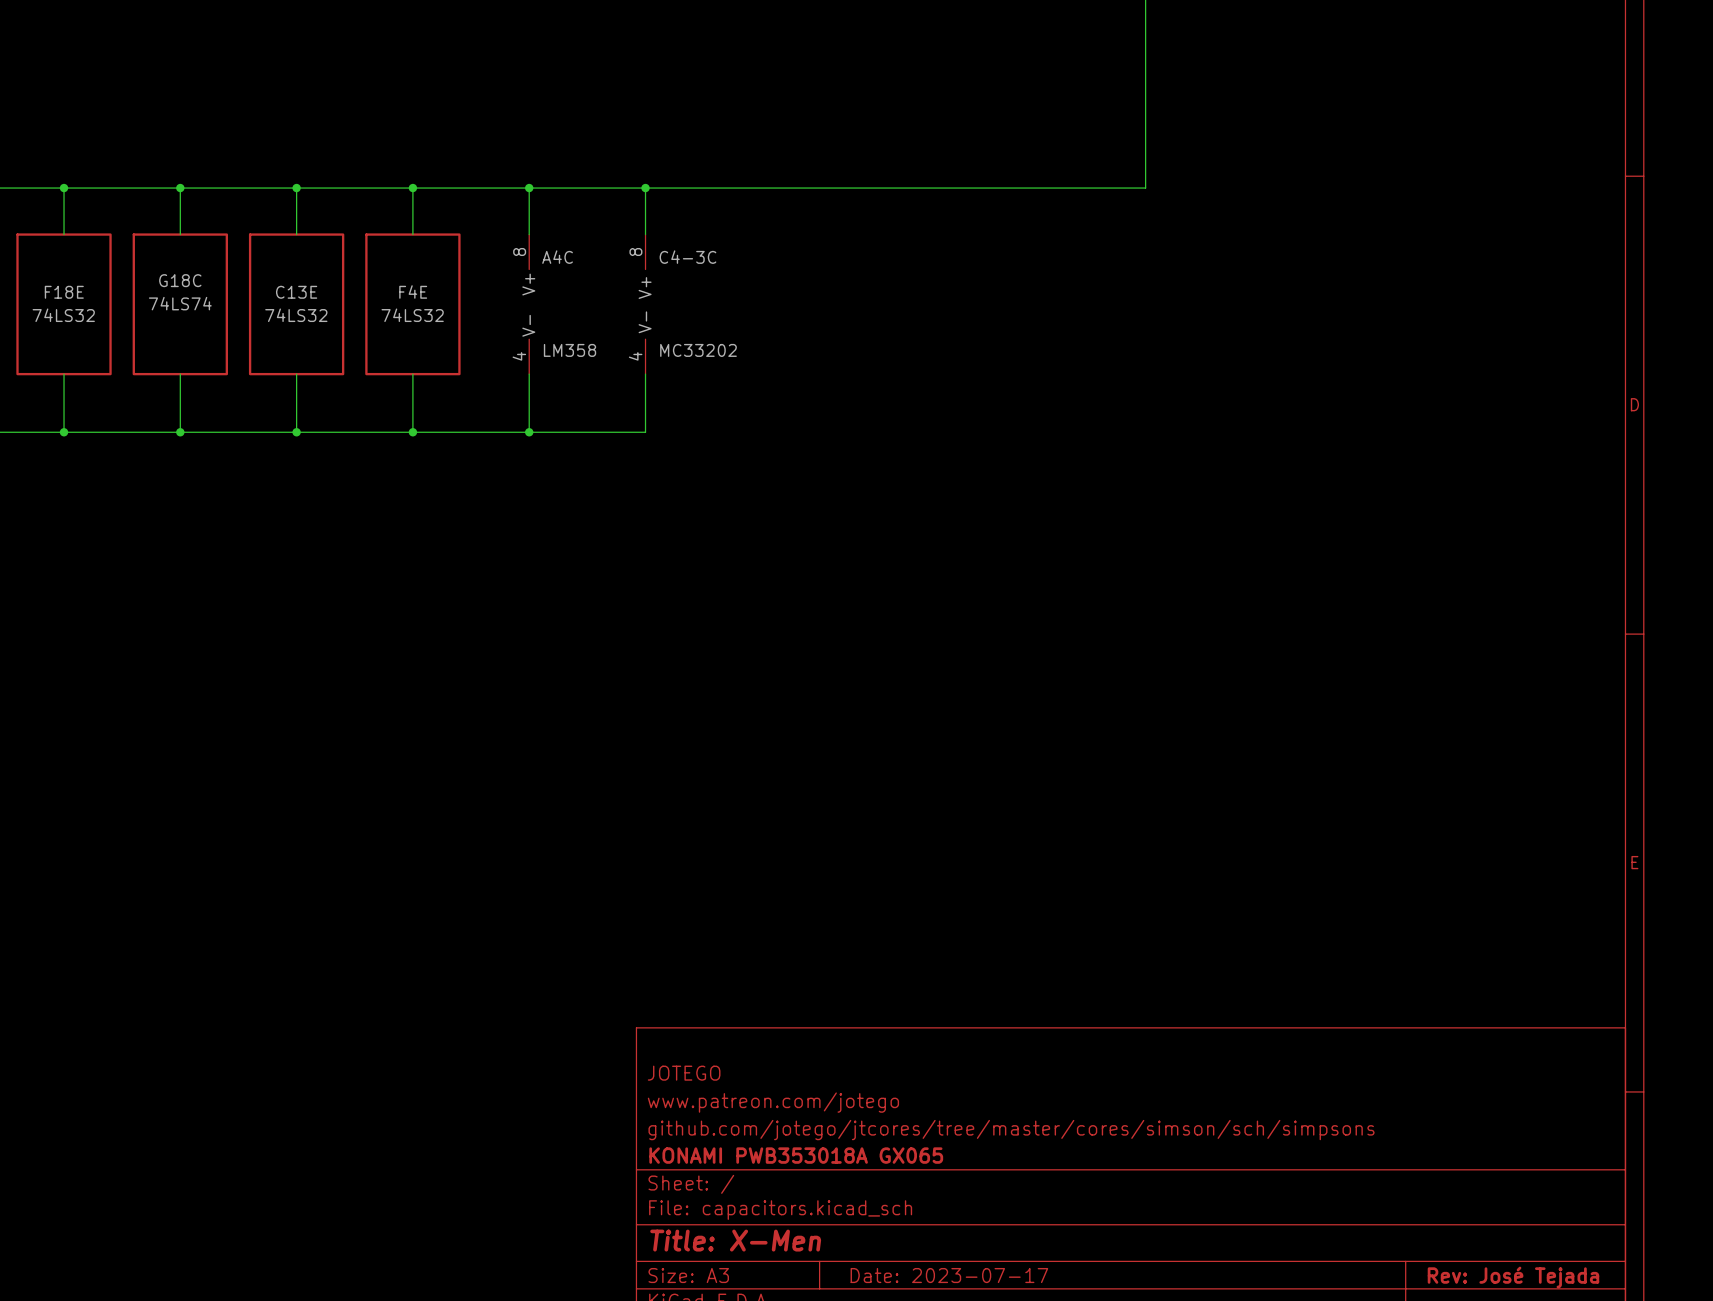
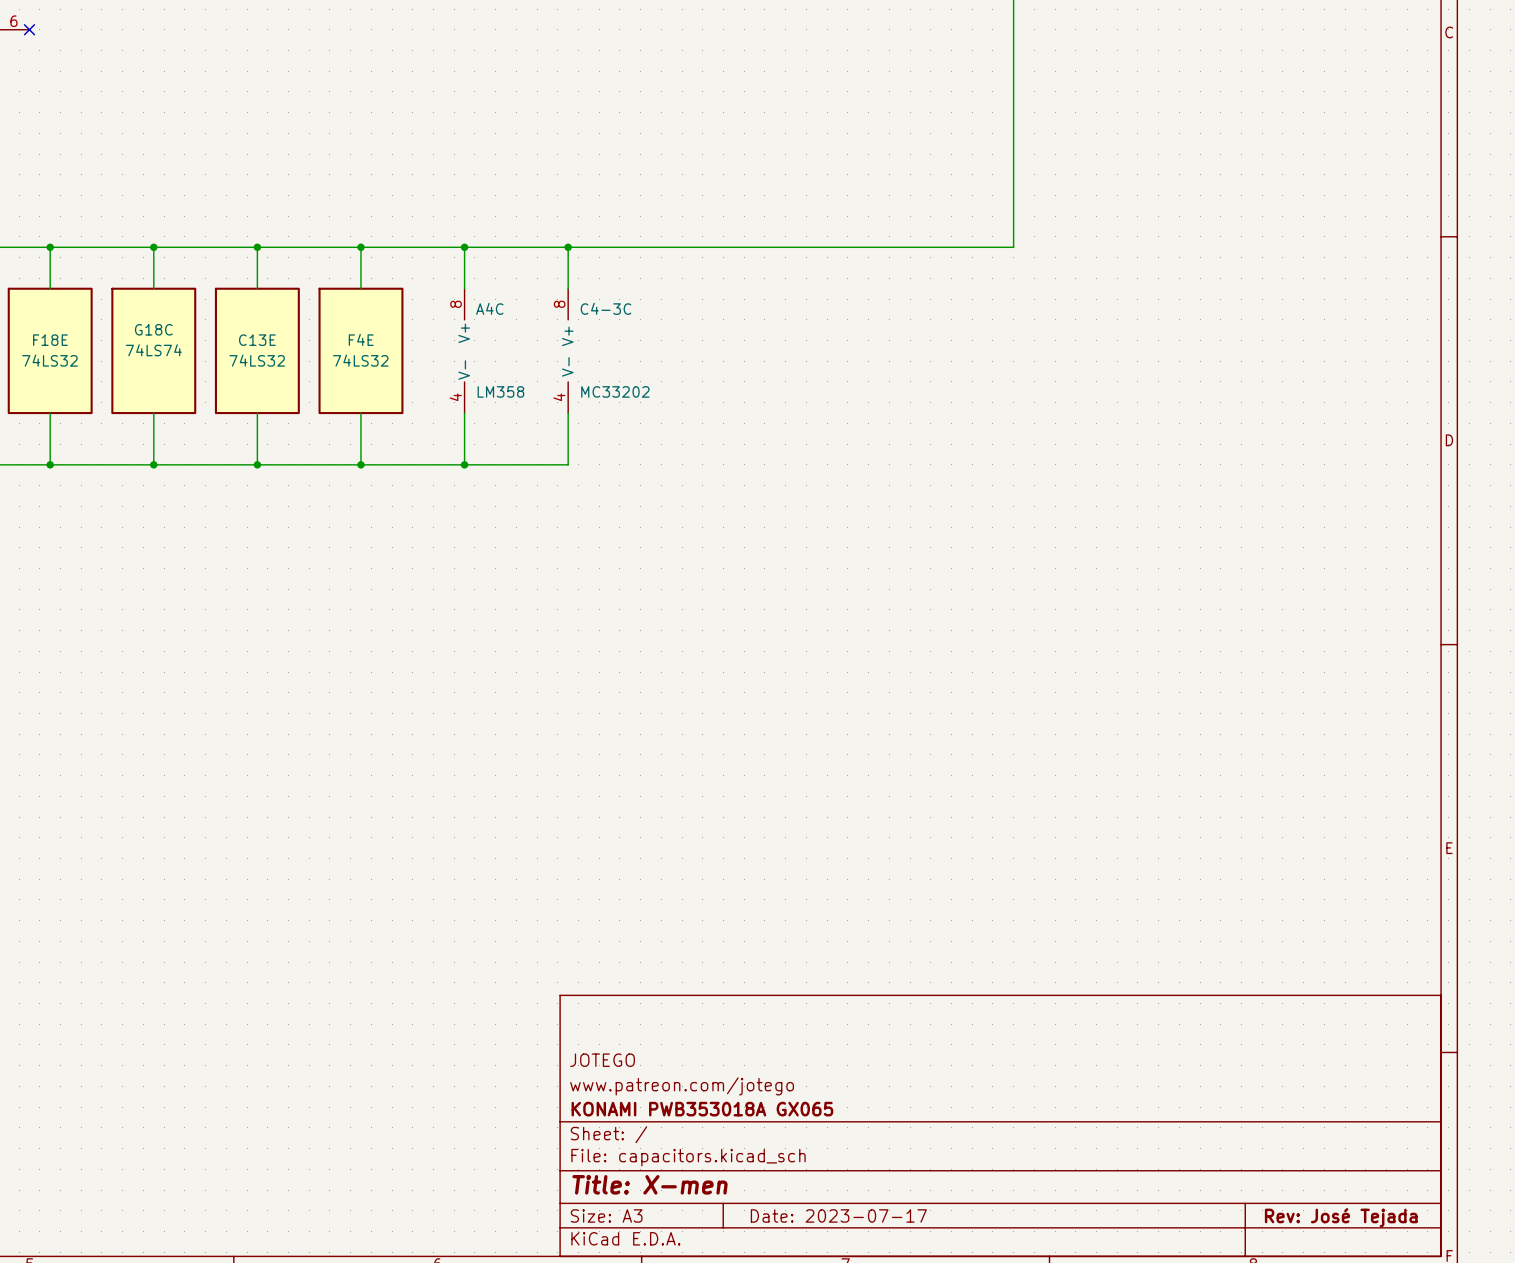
title block: JOTEGO (684, 1073) -> none
title block: www.patreon.com/jotego (773, 1102) -> JOTEGO (602, 1060)
title block: github.com/jotego/jtcores/tree/master/cores/simson/sch/simpsons (1011, 1130) -> www.patreon.com/jotego (682, 1086)
title block: Title: X-Men (735, 1240) -> Title: X-men (650, 1184)

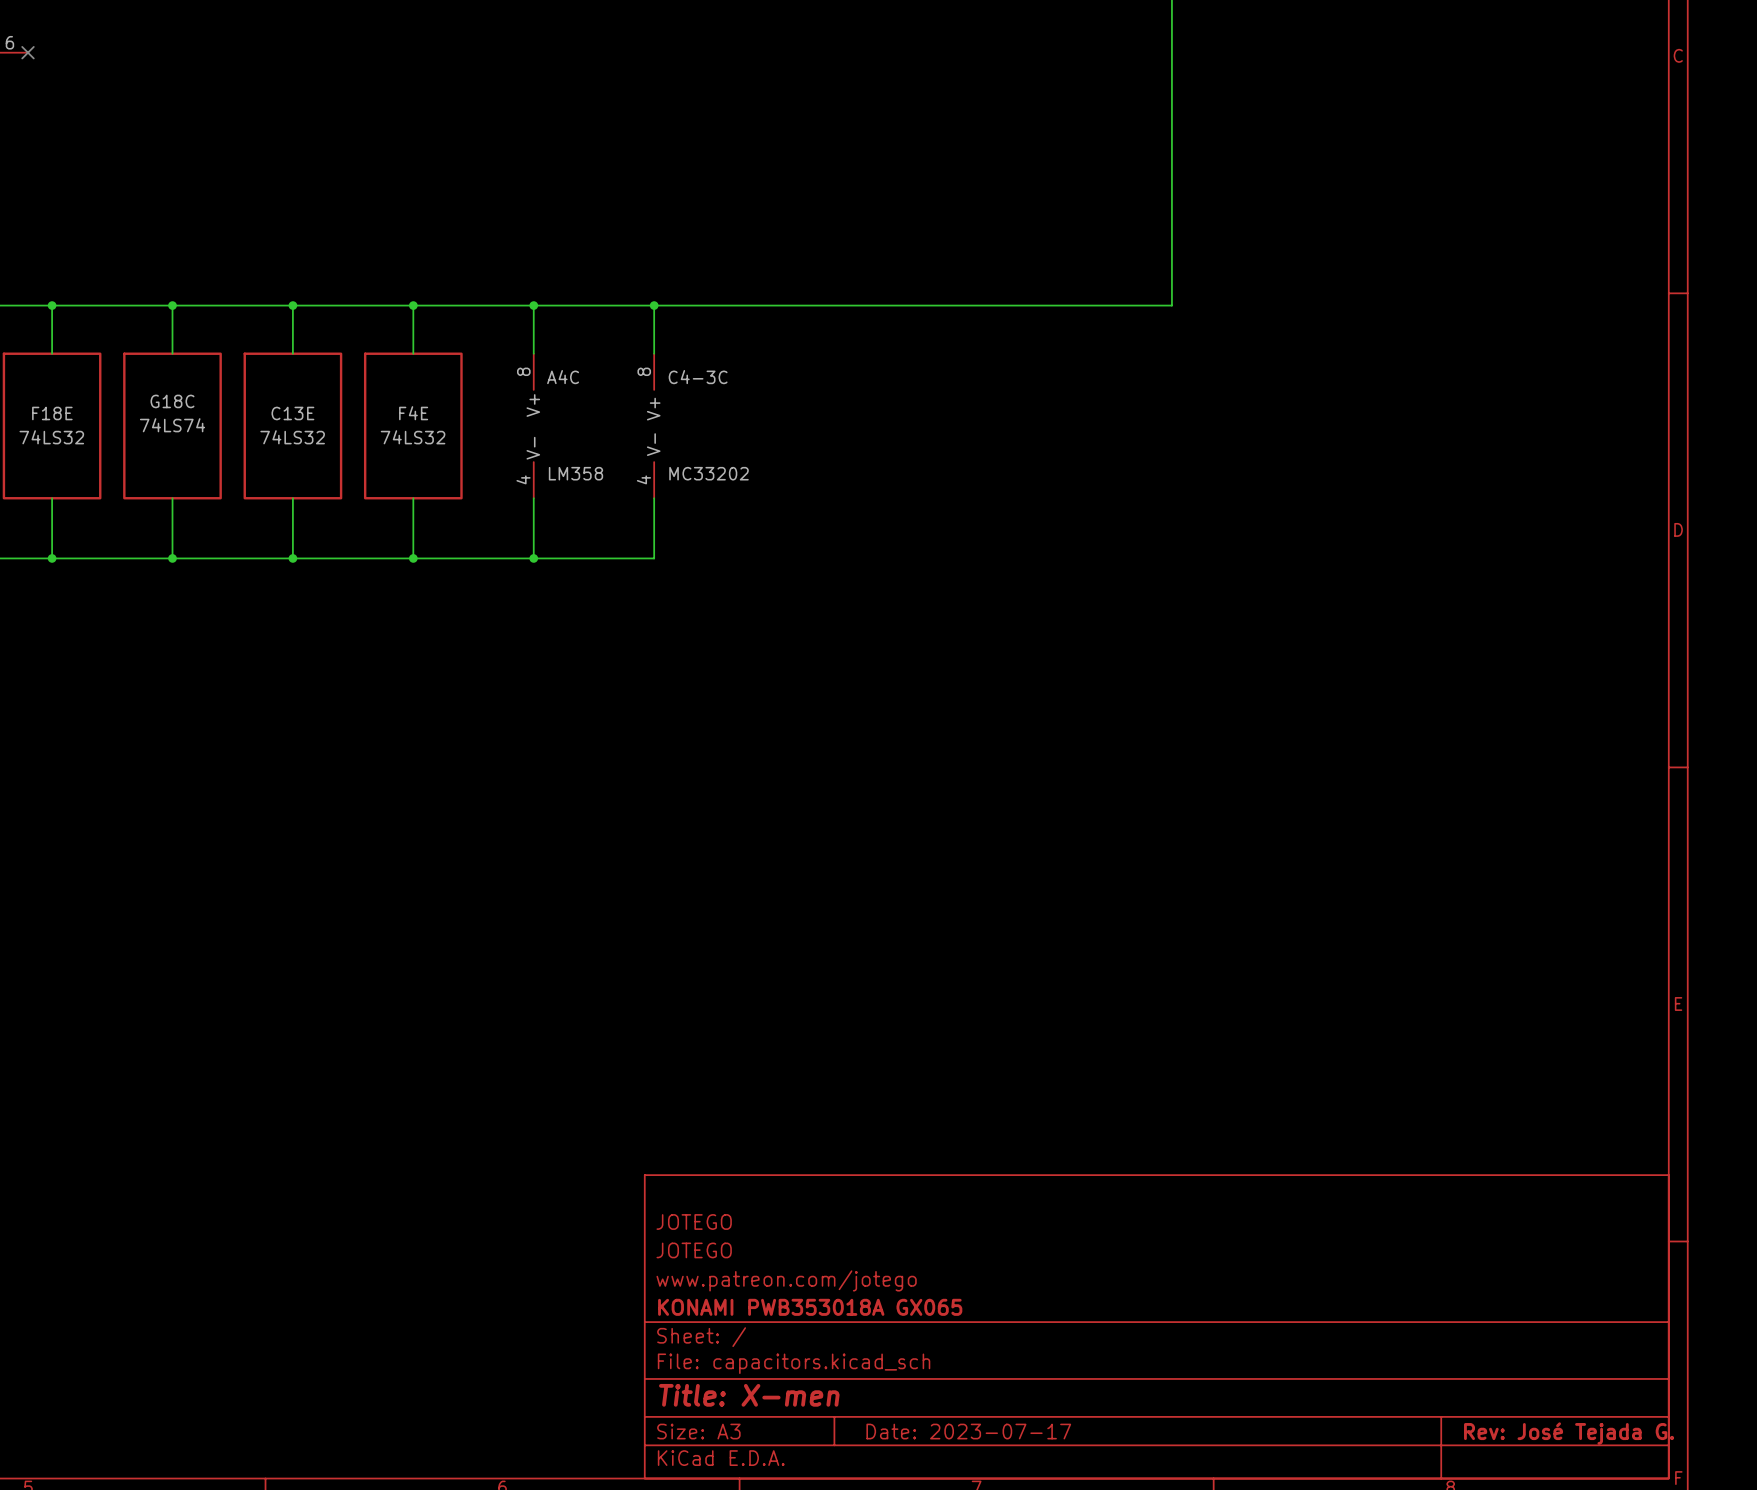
title block: none -> JOTEGO (694, 1221)
title block: Rev: José Tejada (1341, 1217) -> Rev: José Tejada G. (1569, 1433)

